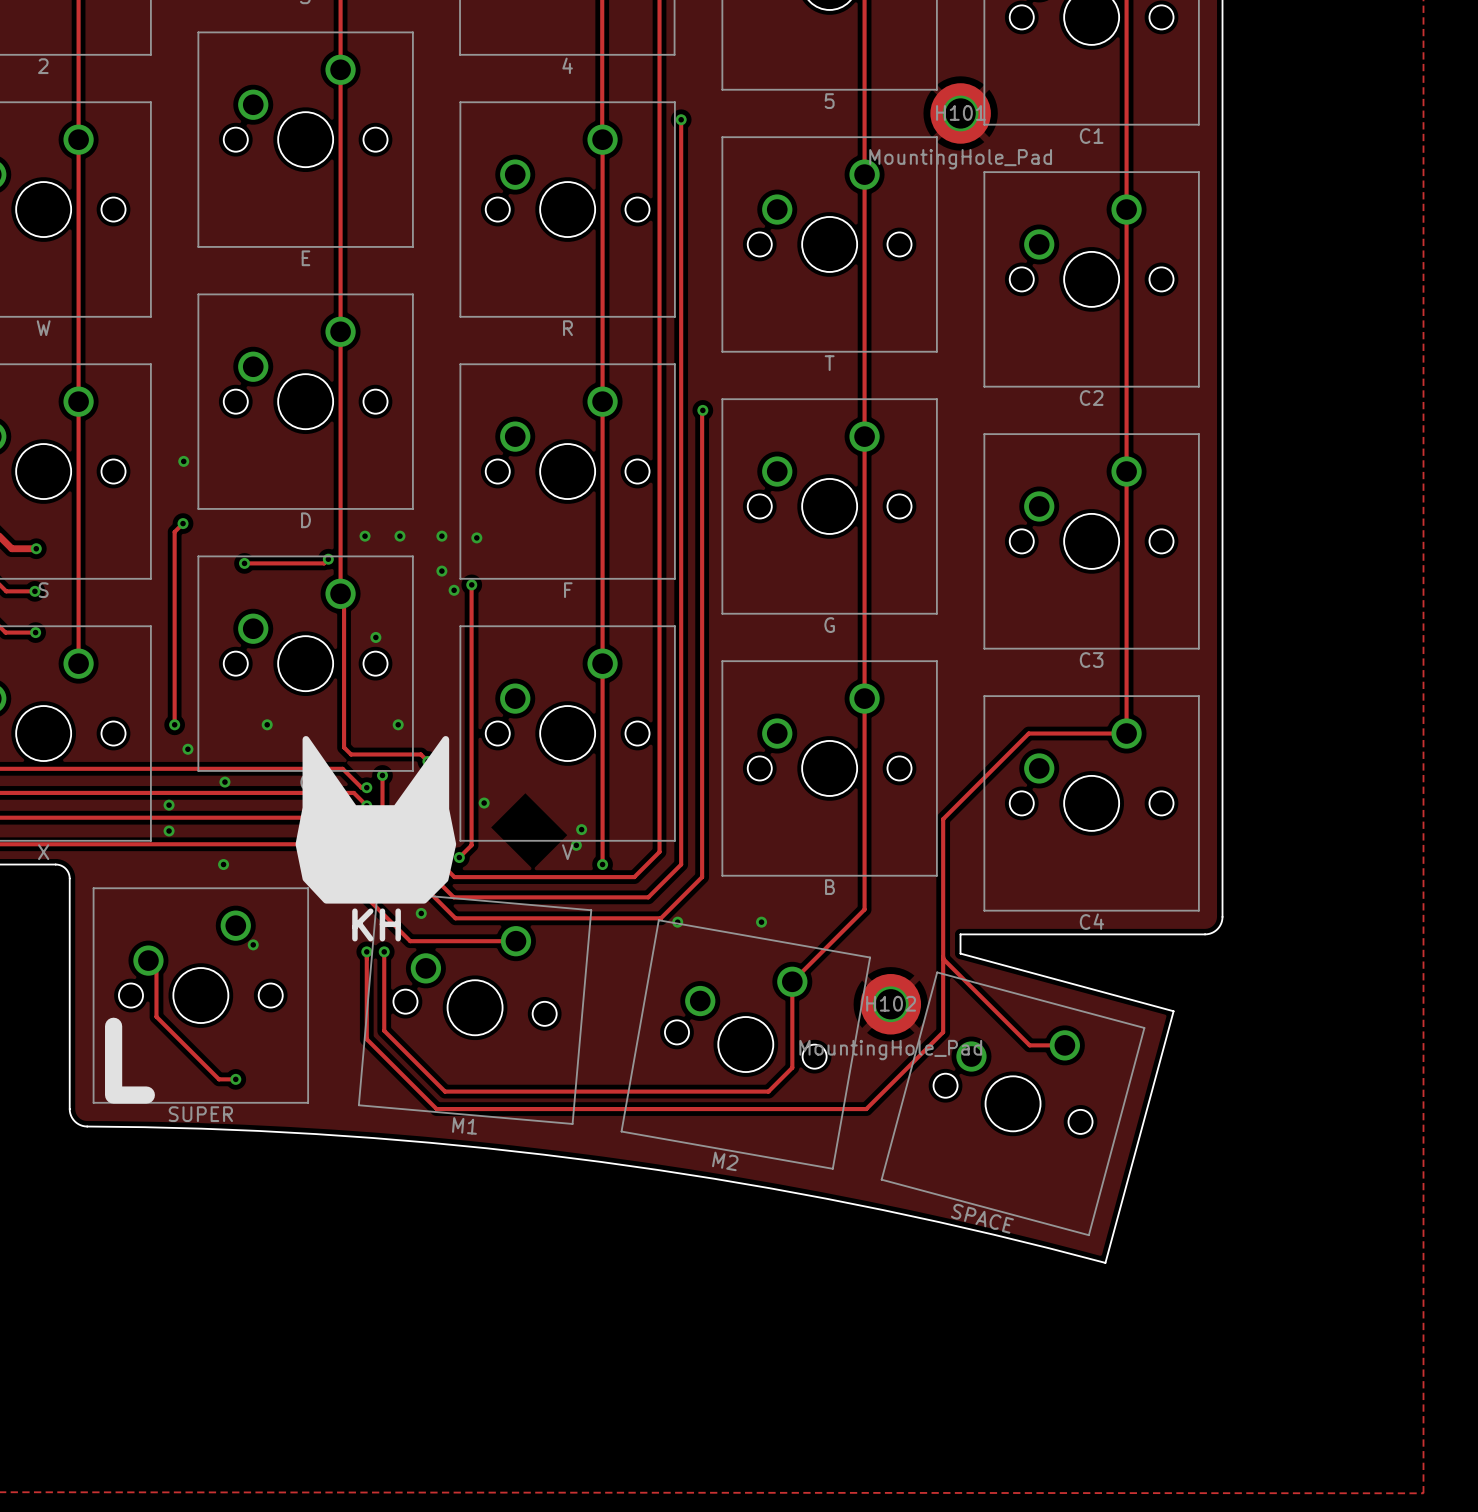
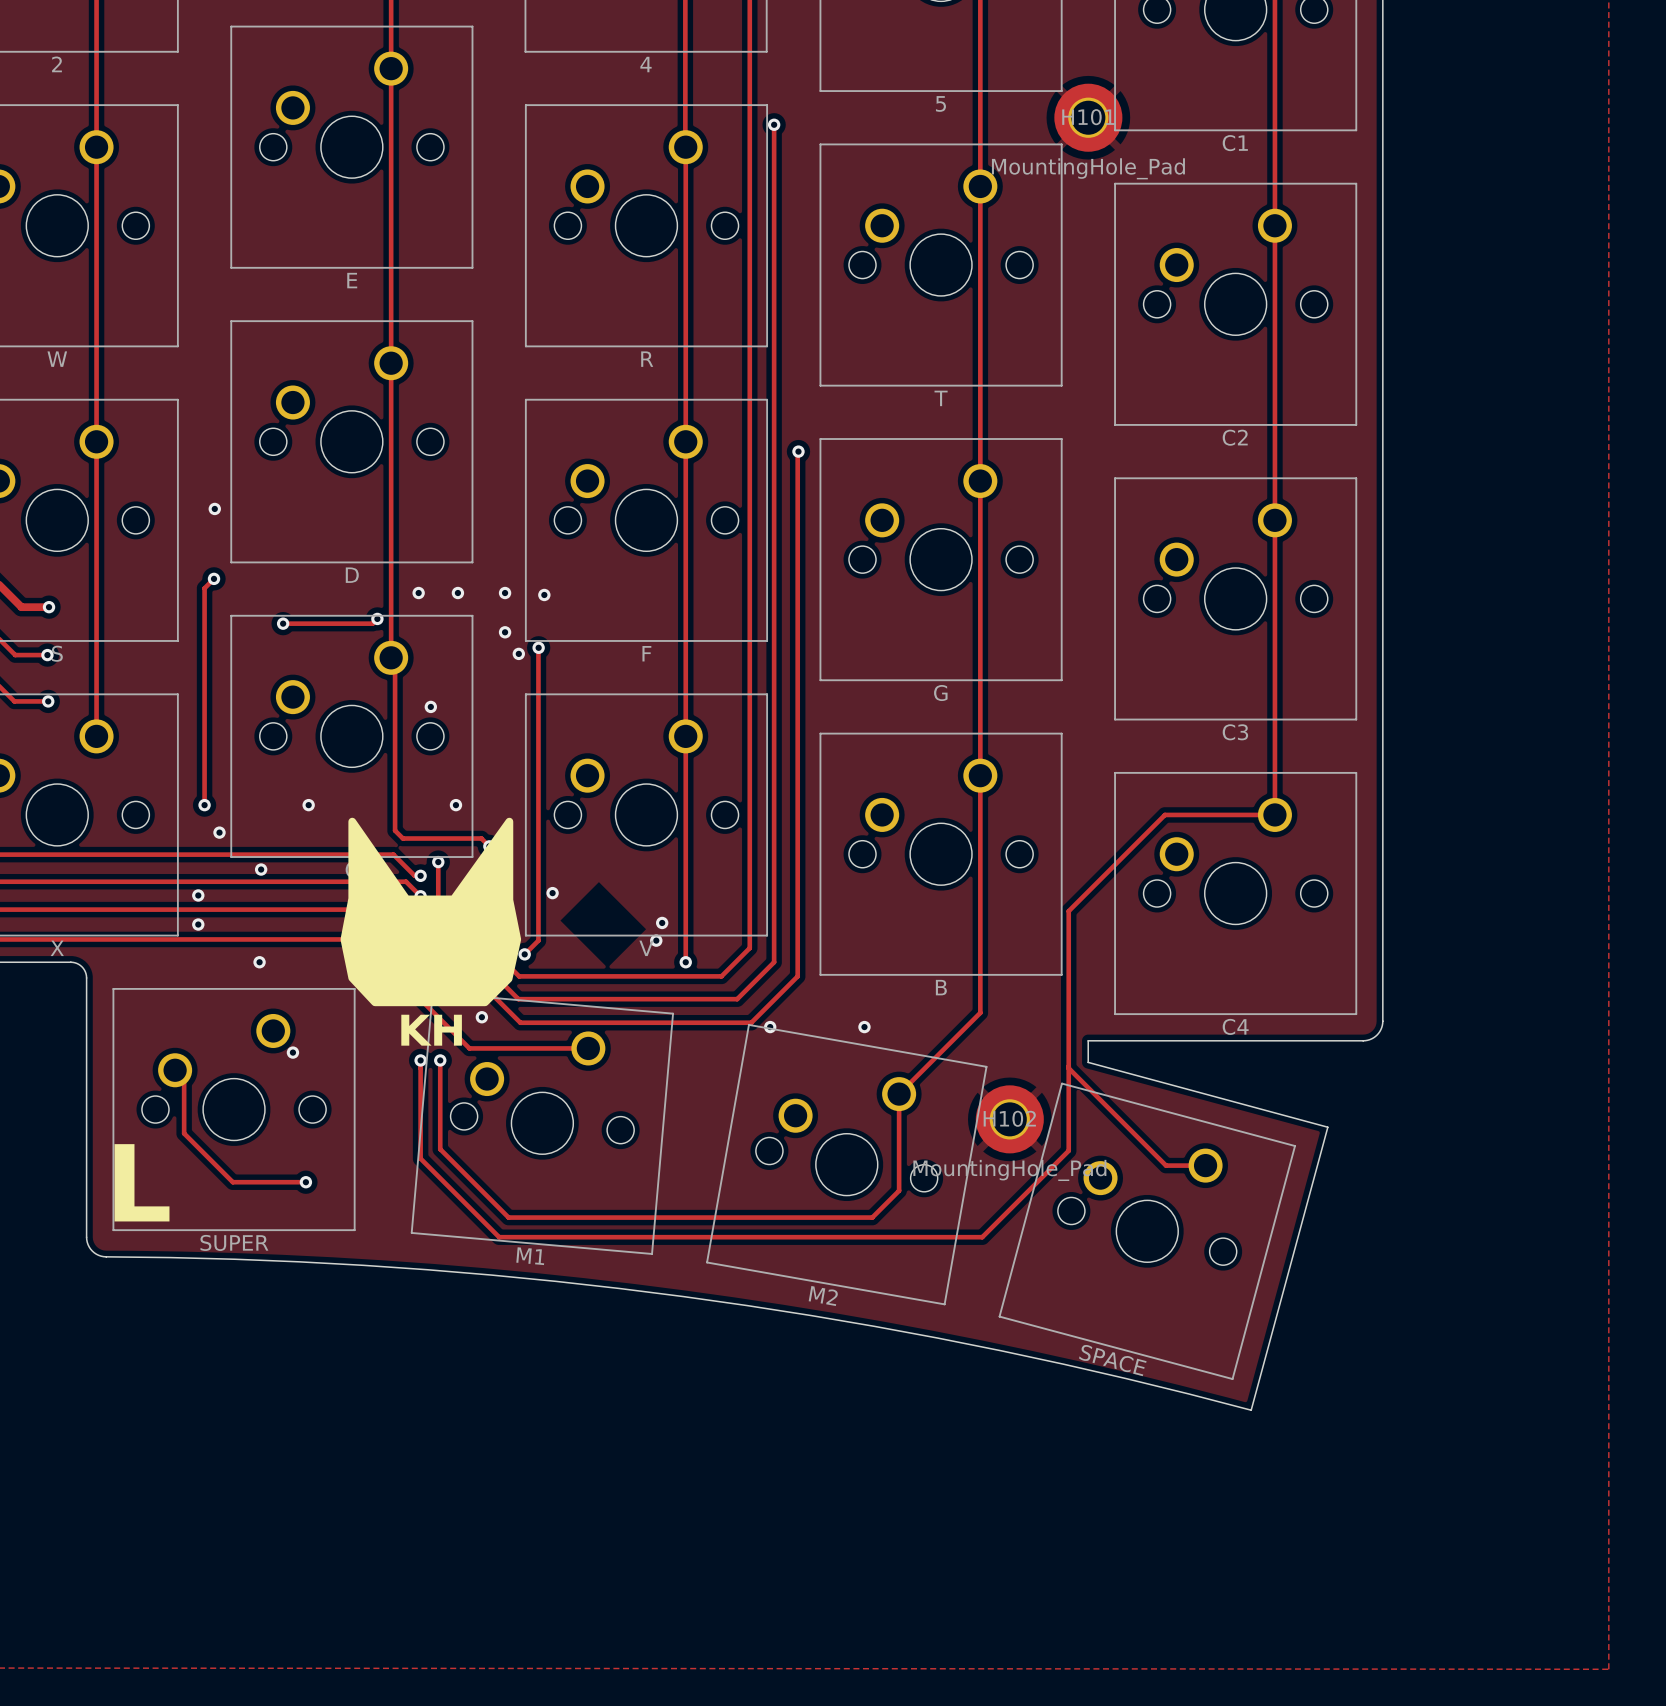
track: (199, 1060) (219, 1079) (235, 1079) -> (232, 1182) (305, 1182)
via position: (235, 1079) -> (305, 1182)

